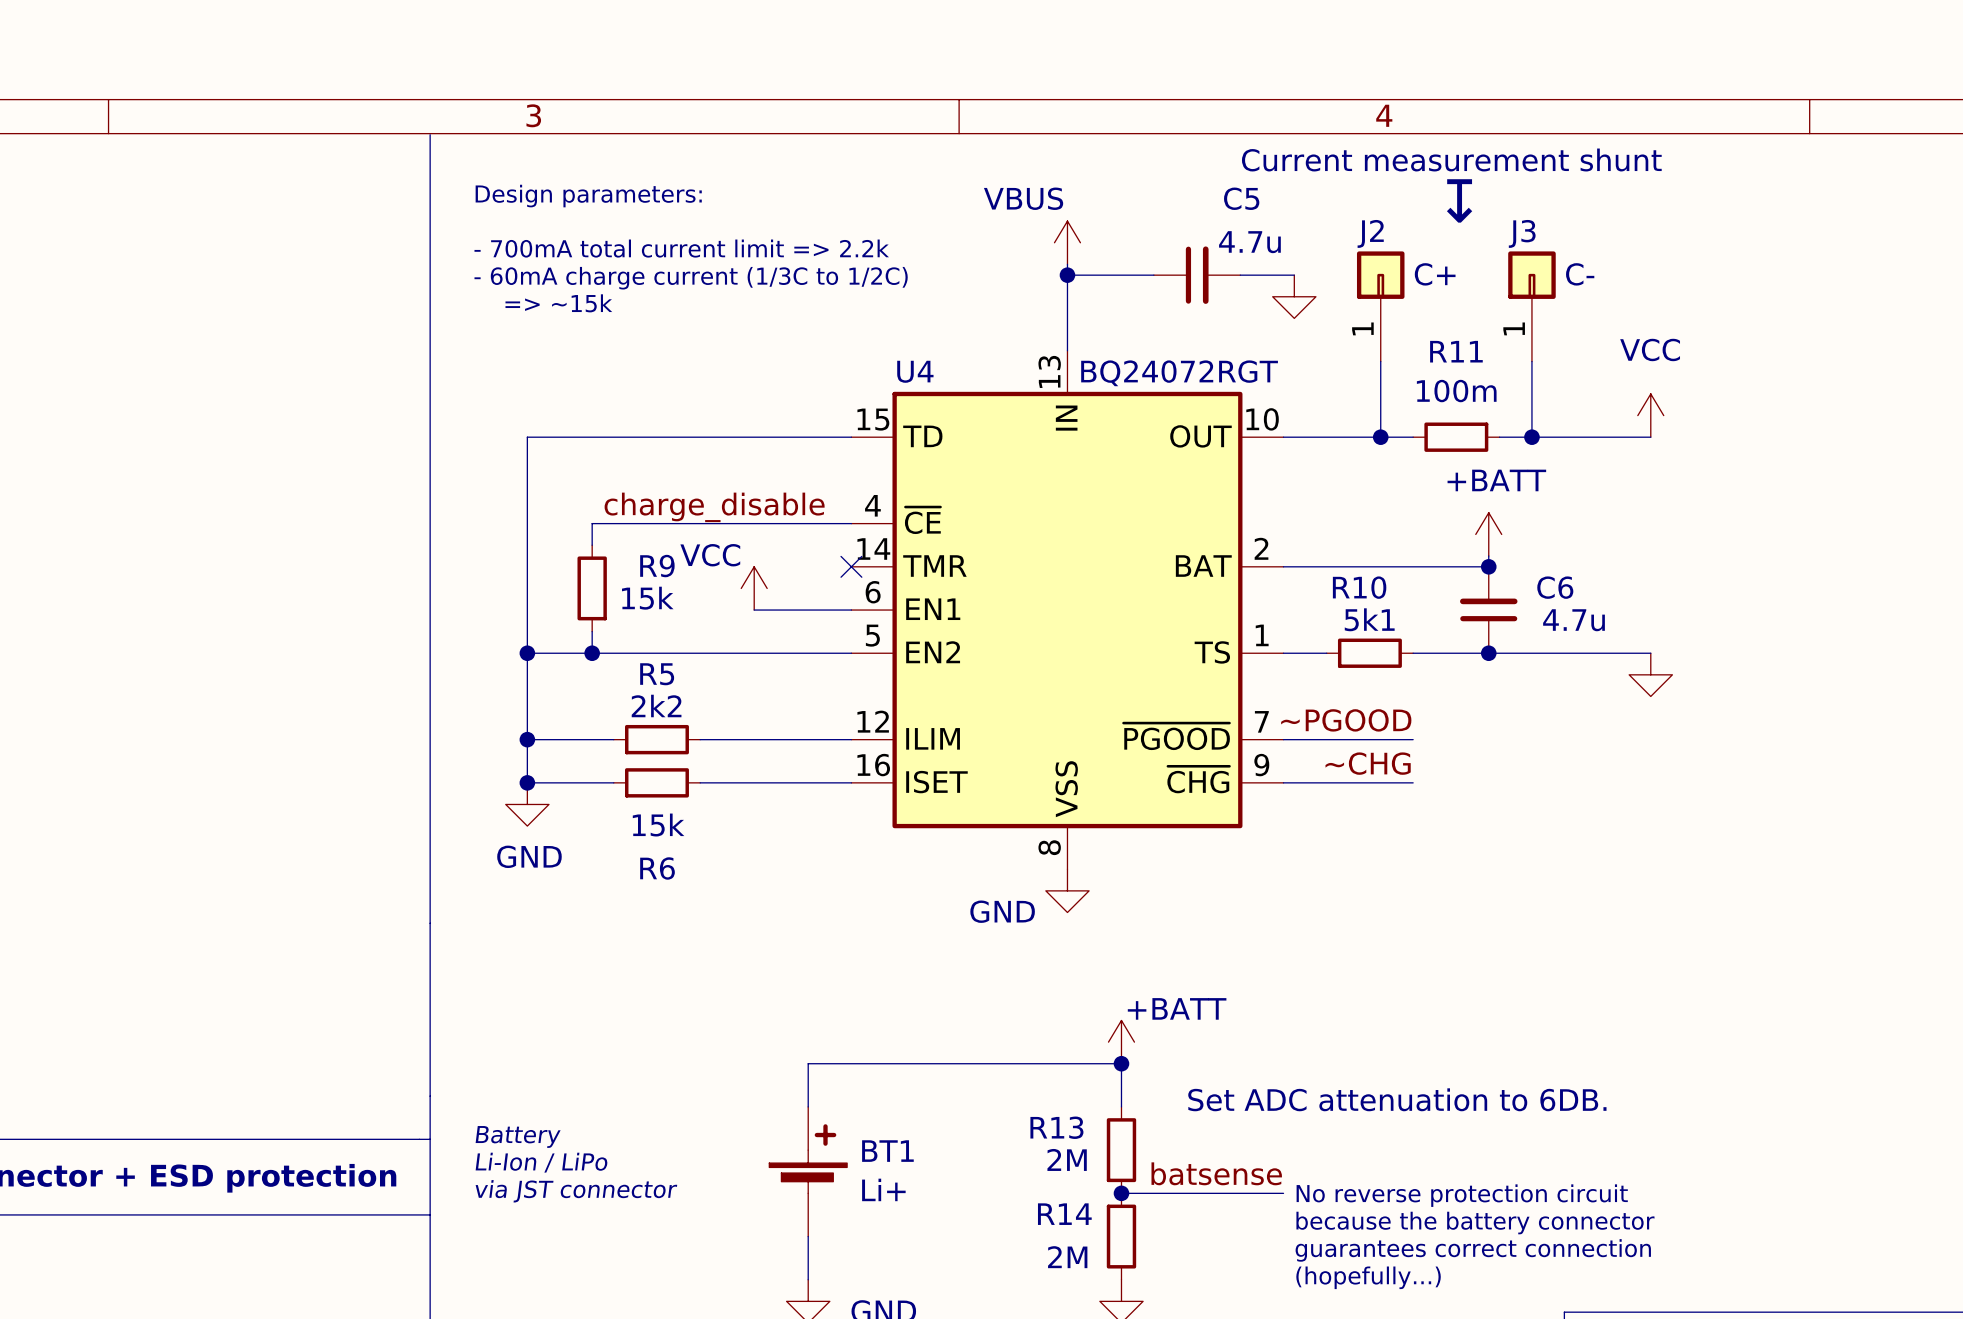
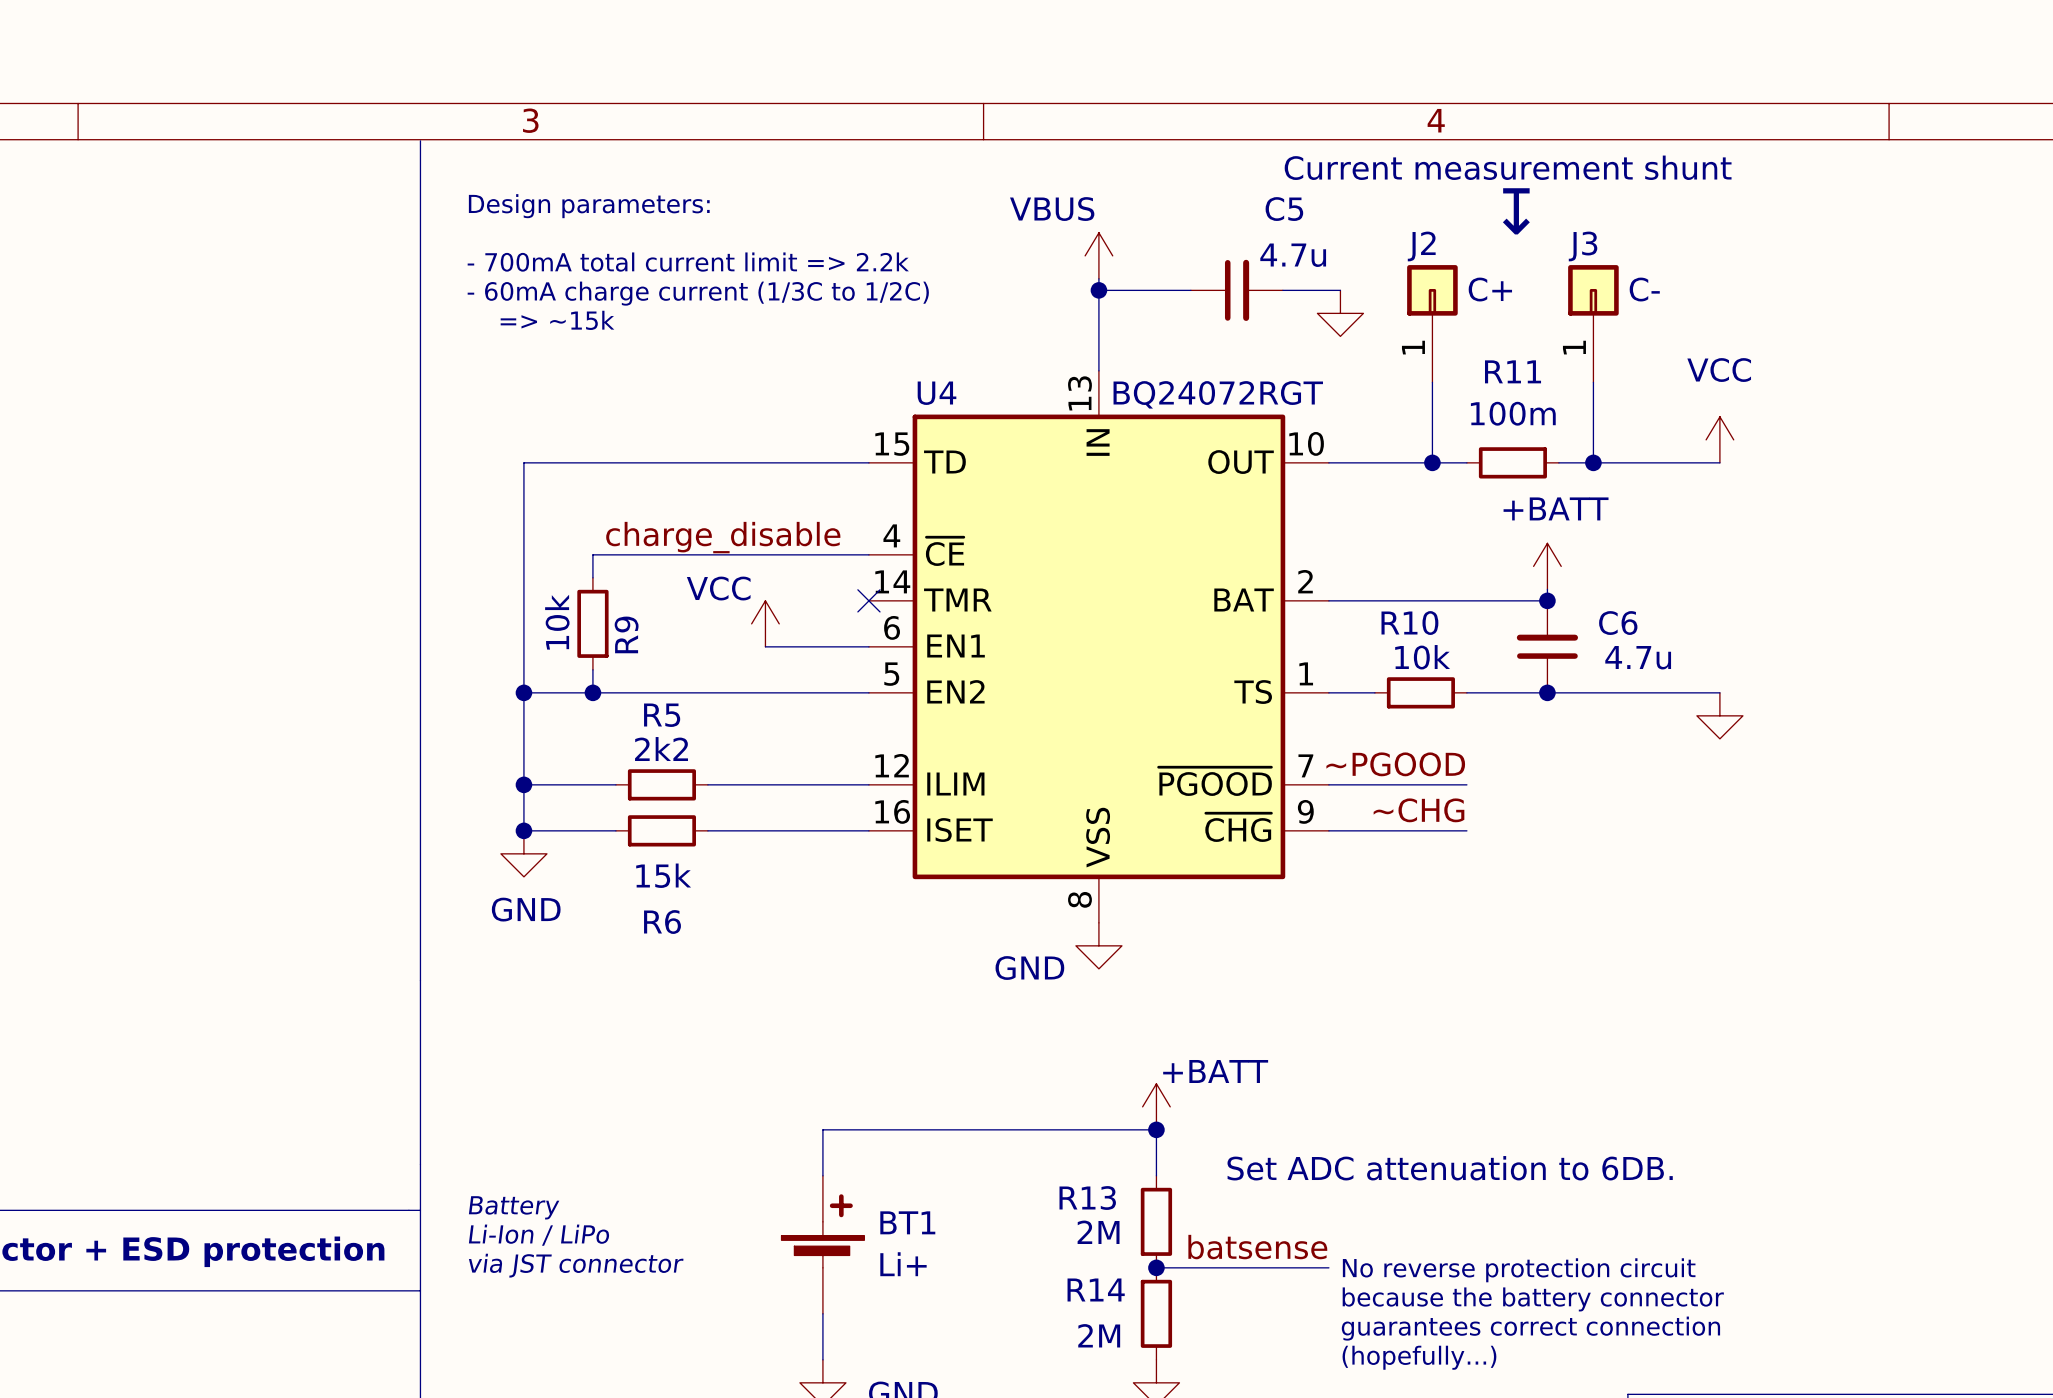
R9 name rotation: 0° (657, 566) -> 90° counterclockwise (626, 634)
R9 value: 15k (647, 598) -> 10k (557, 622)
R10 value: 5k1 (1369, 619) -> 10k (1422, 657)

